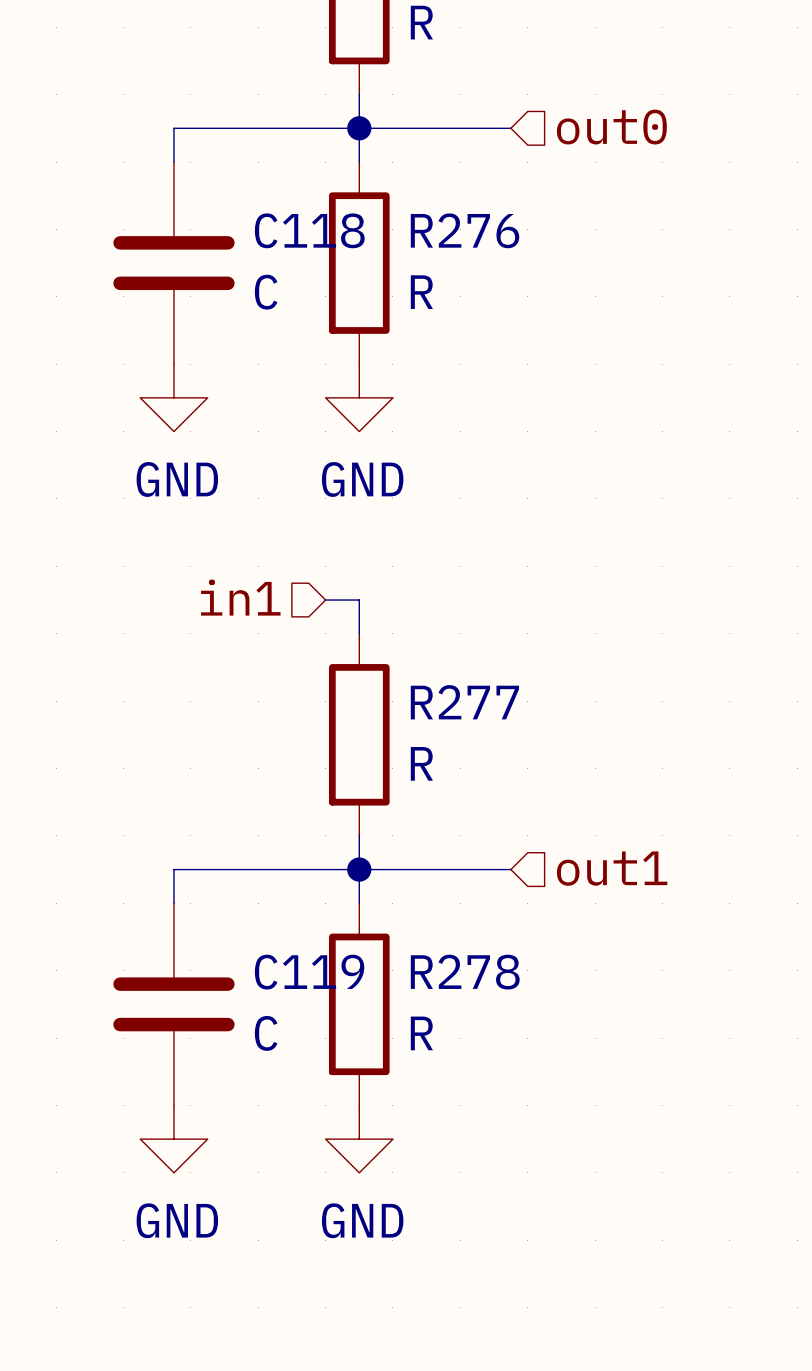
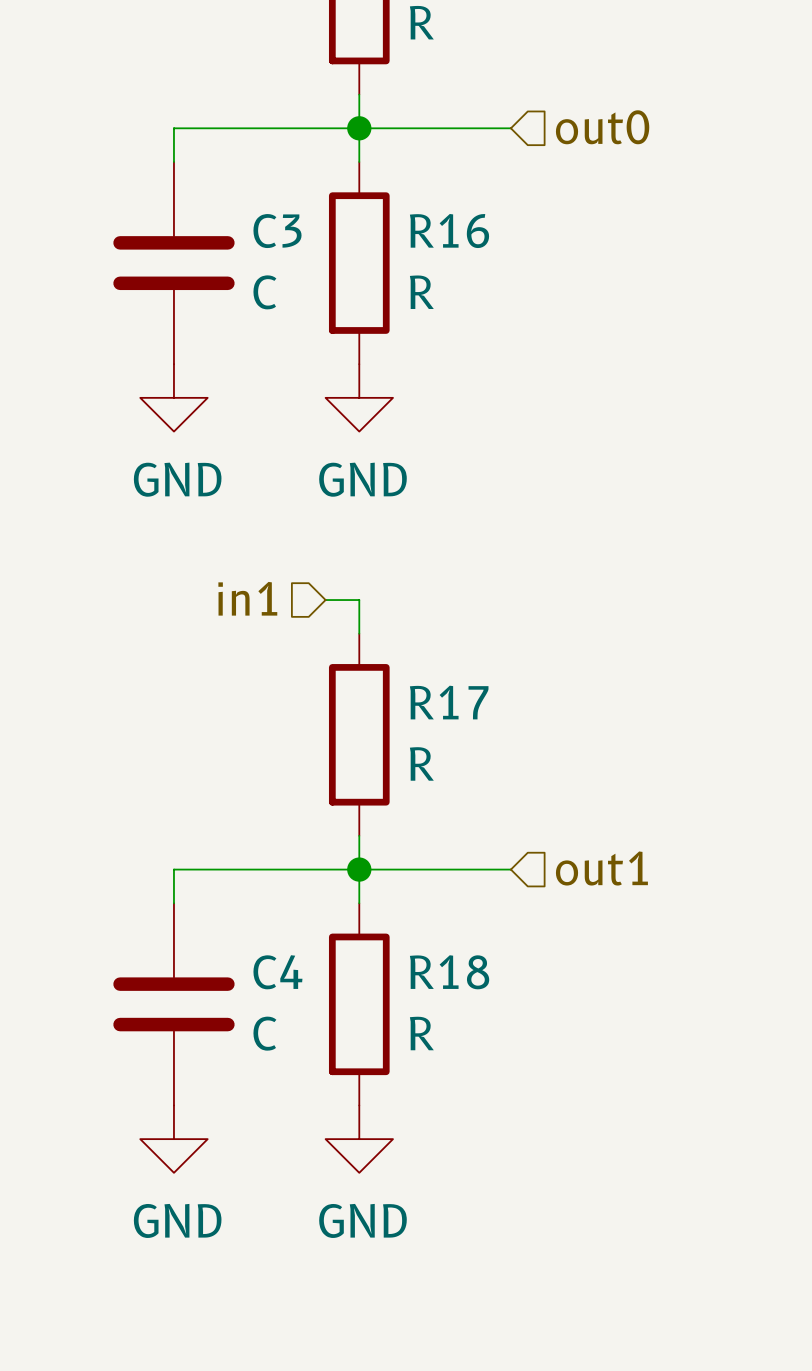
C118 name: C118 (309, 230) -> C3 (277, 231)
R276 name: R276 (465, 230) -> R16 (449, 231)
R277 name: R277 (464, 702) -> R17 (449, 702)
C119 name: C119 (309, 972) -> C4 (277, 972)
R278 name: R278 (465, 972) -> R18 (449, 972)

